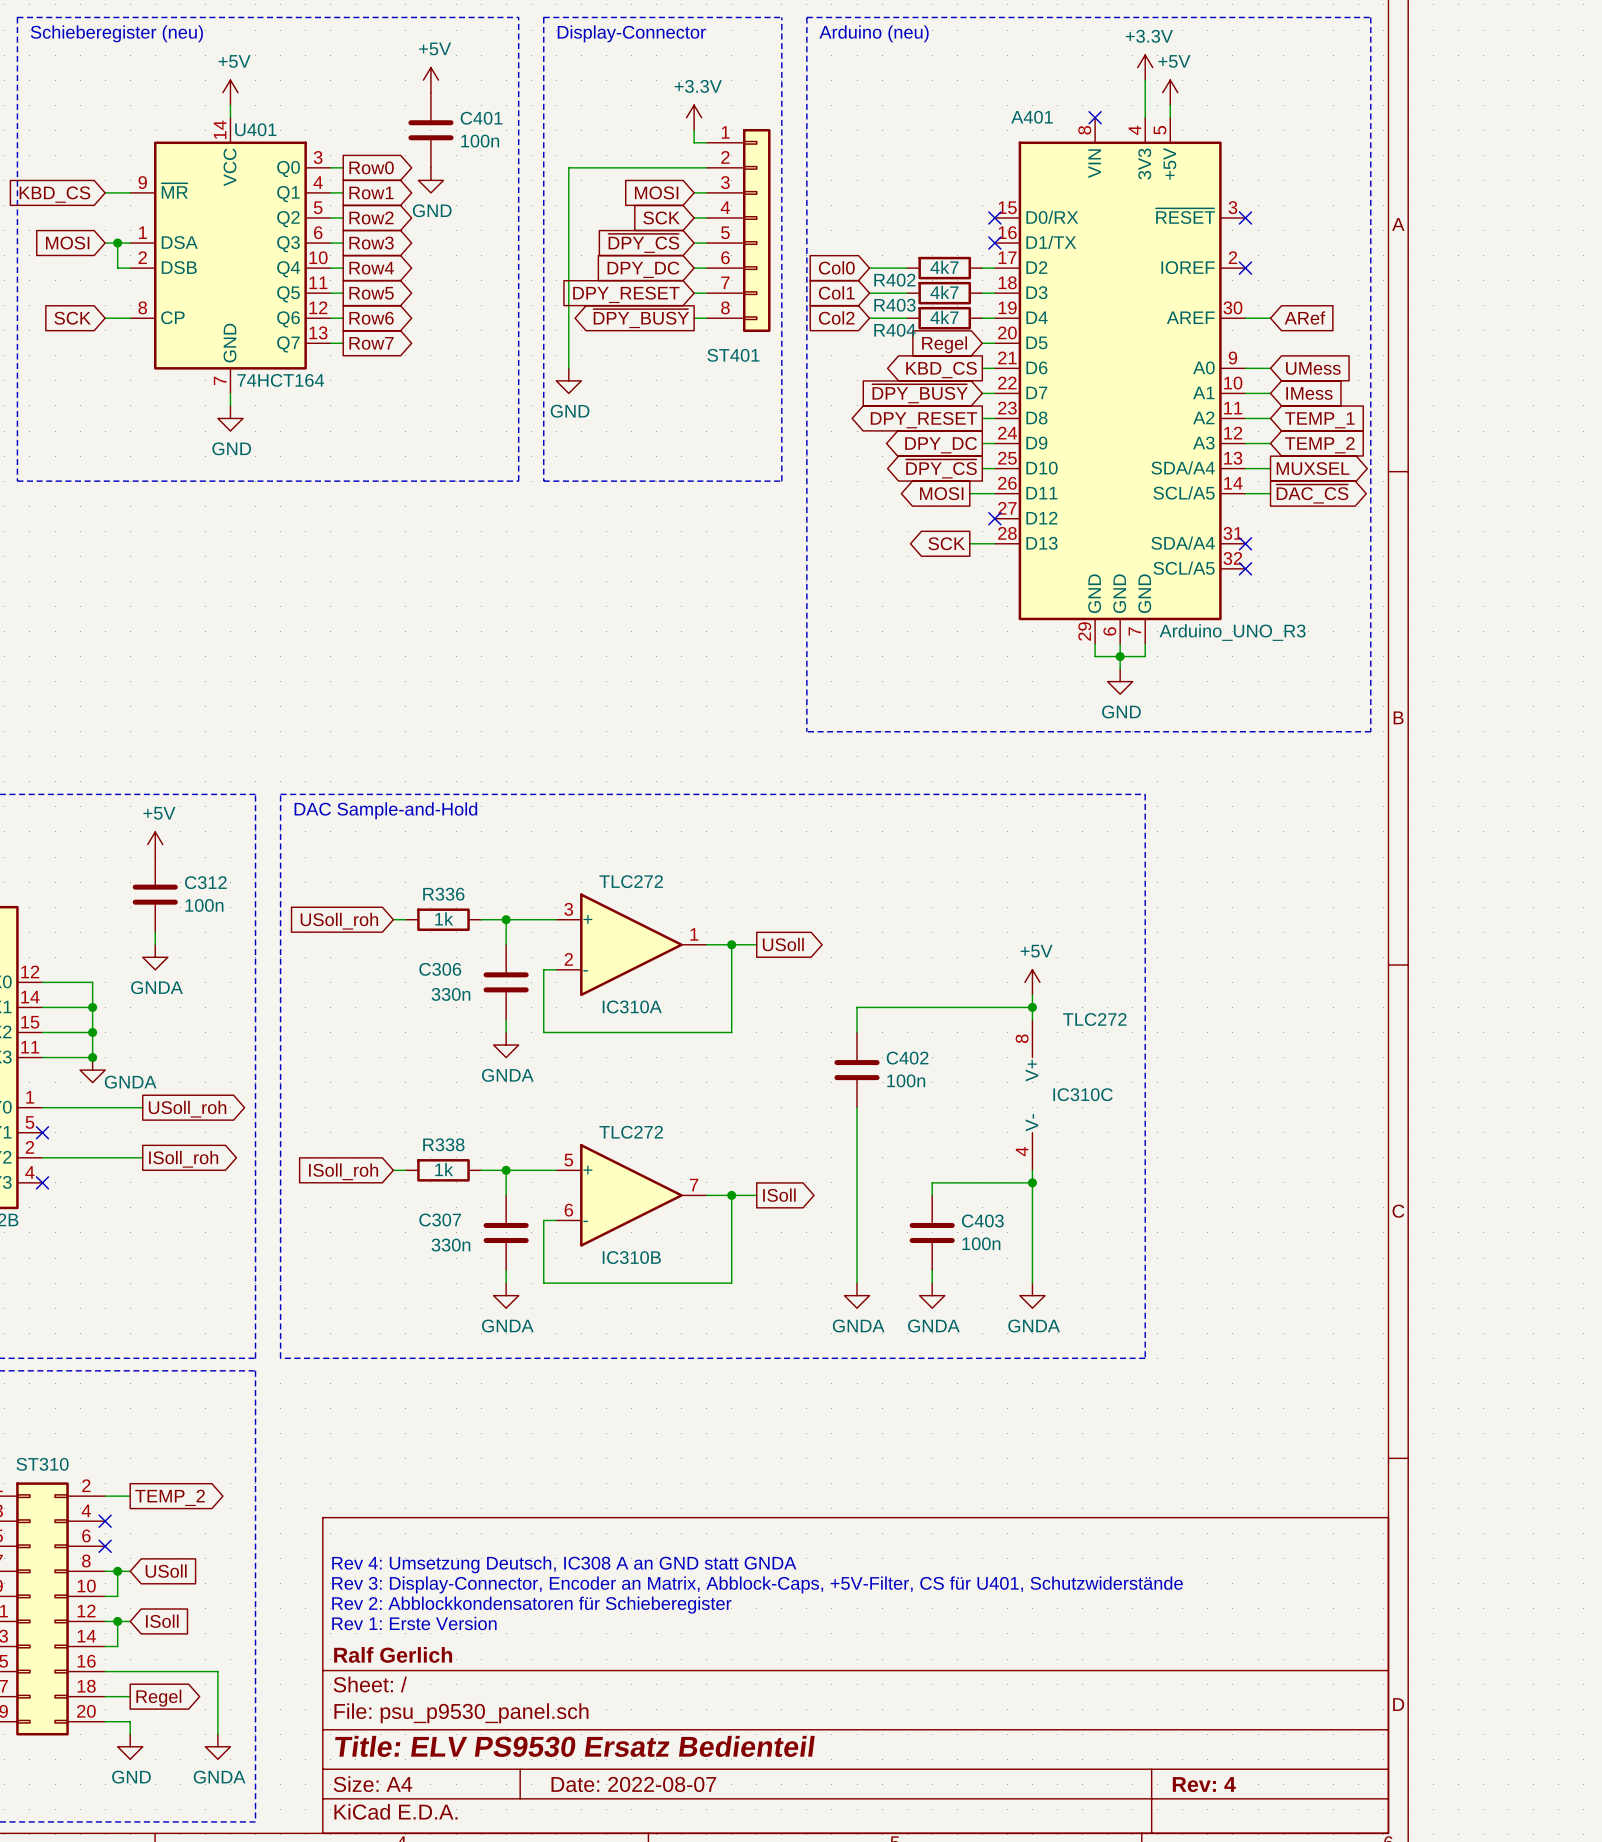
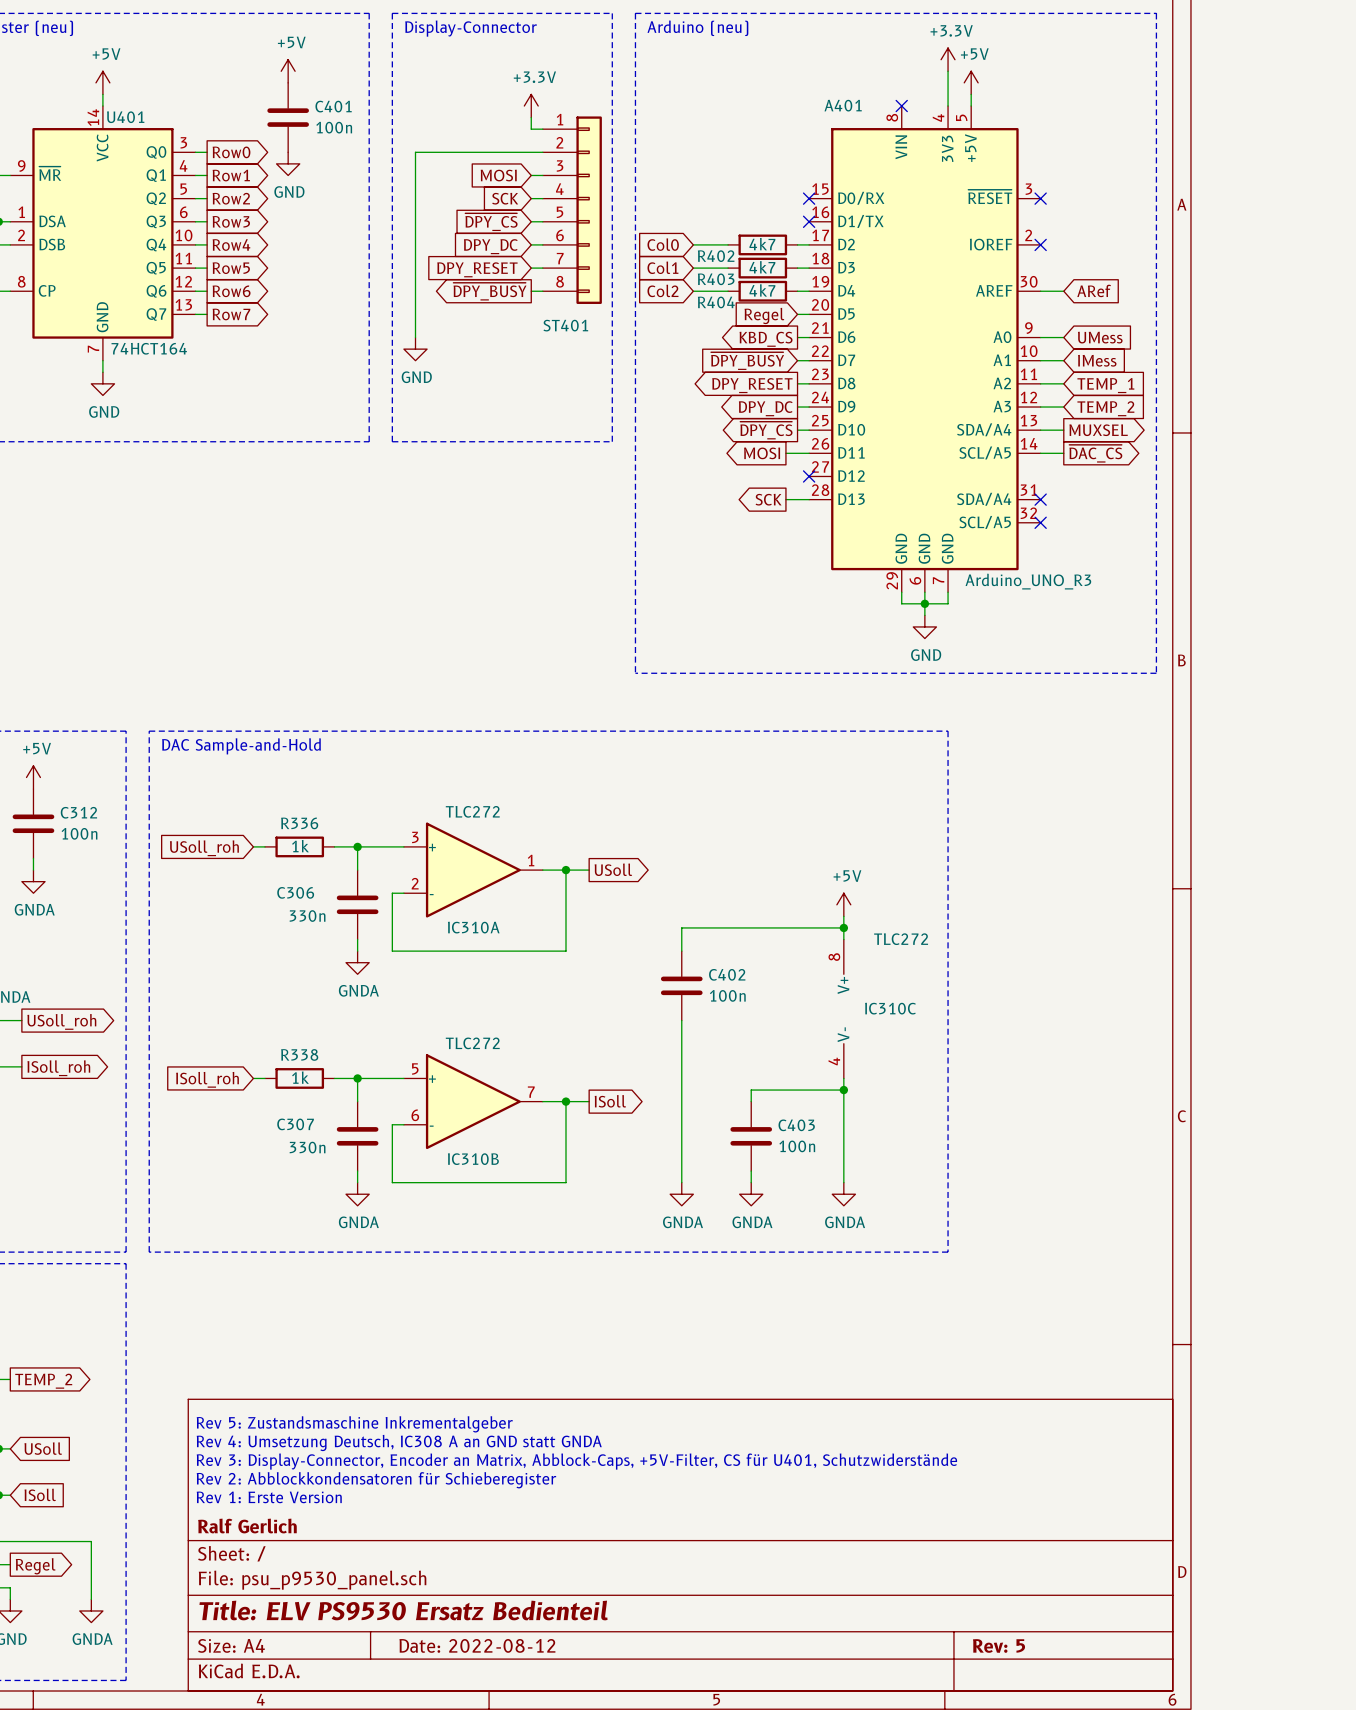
text: none -> Rev 5: Zustandsmaschine Inkrementalgeber (354, 1424)
title block: Date: 2022-08-07 (633, 1784) -> Date: 2022-08-12 (477, 1645)
title block: Rev: 4 (1204, 1784) -> Rev: 5 (999, 1646)

